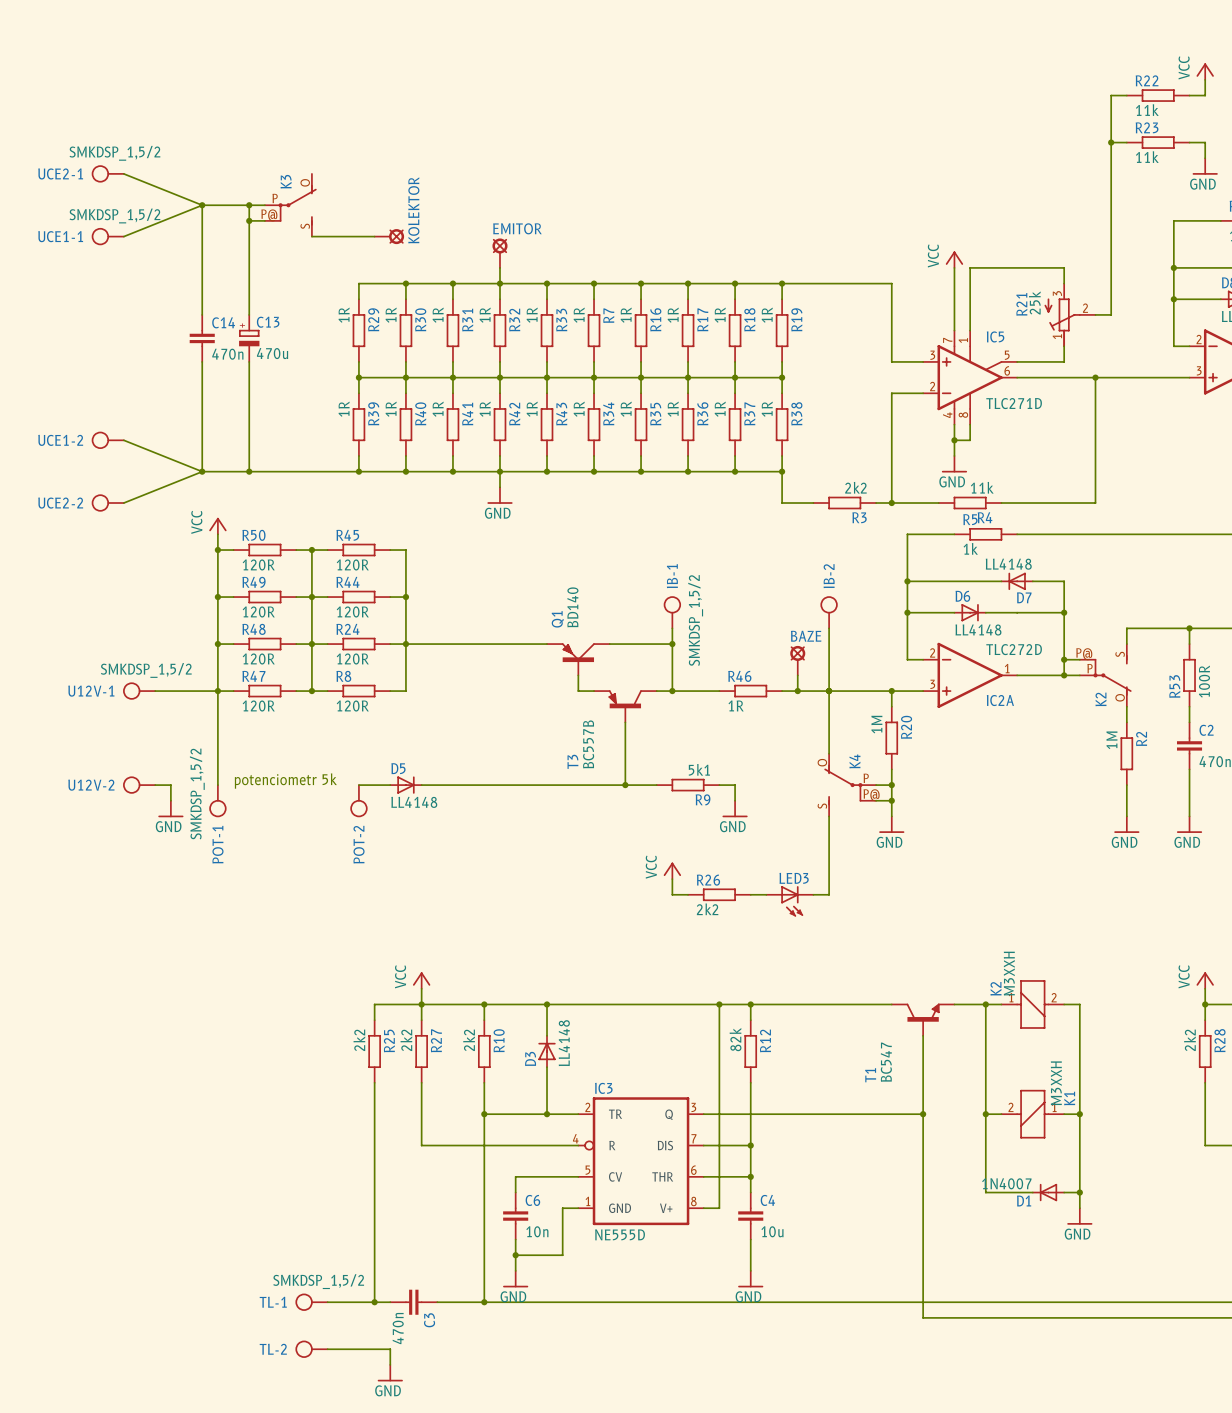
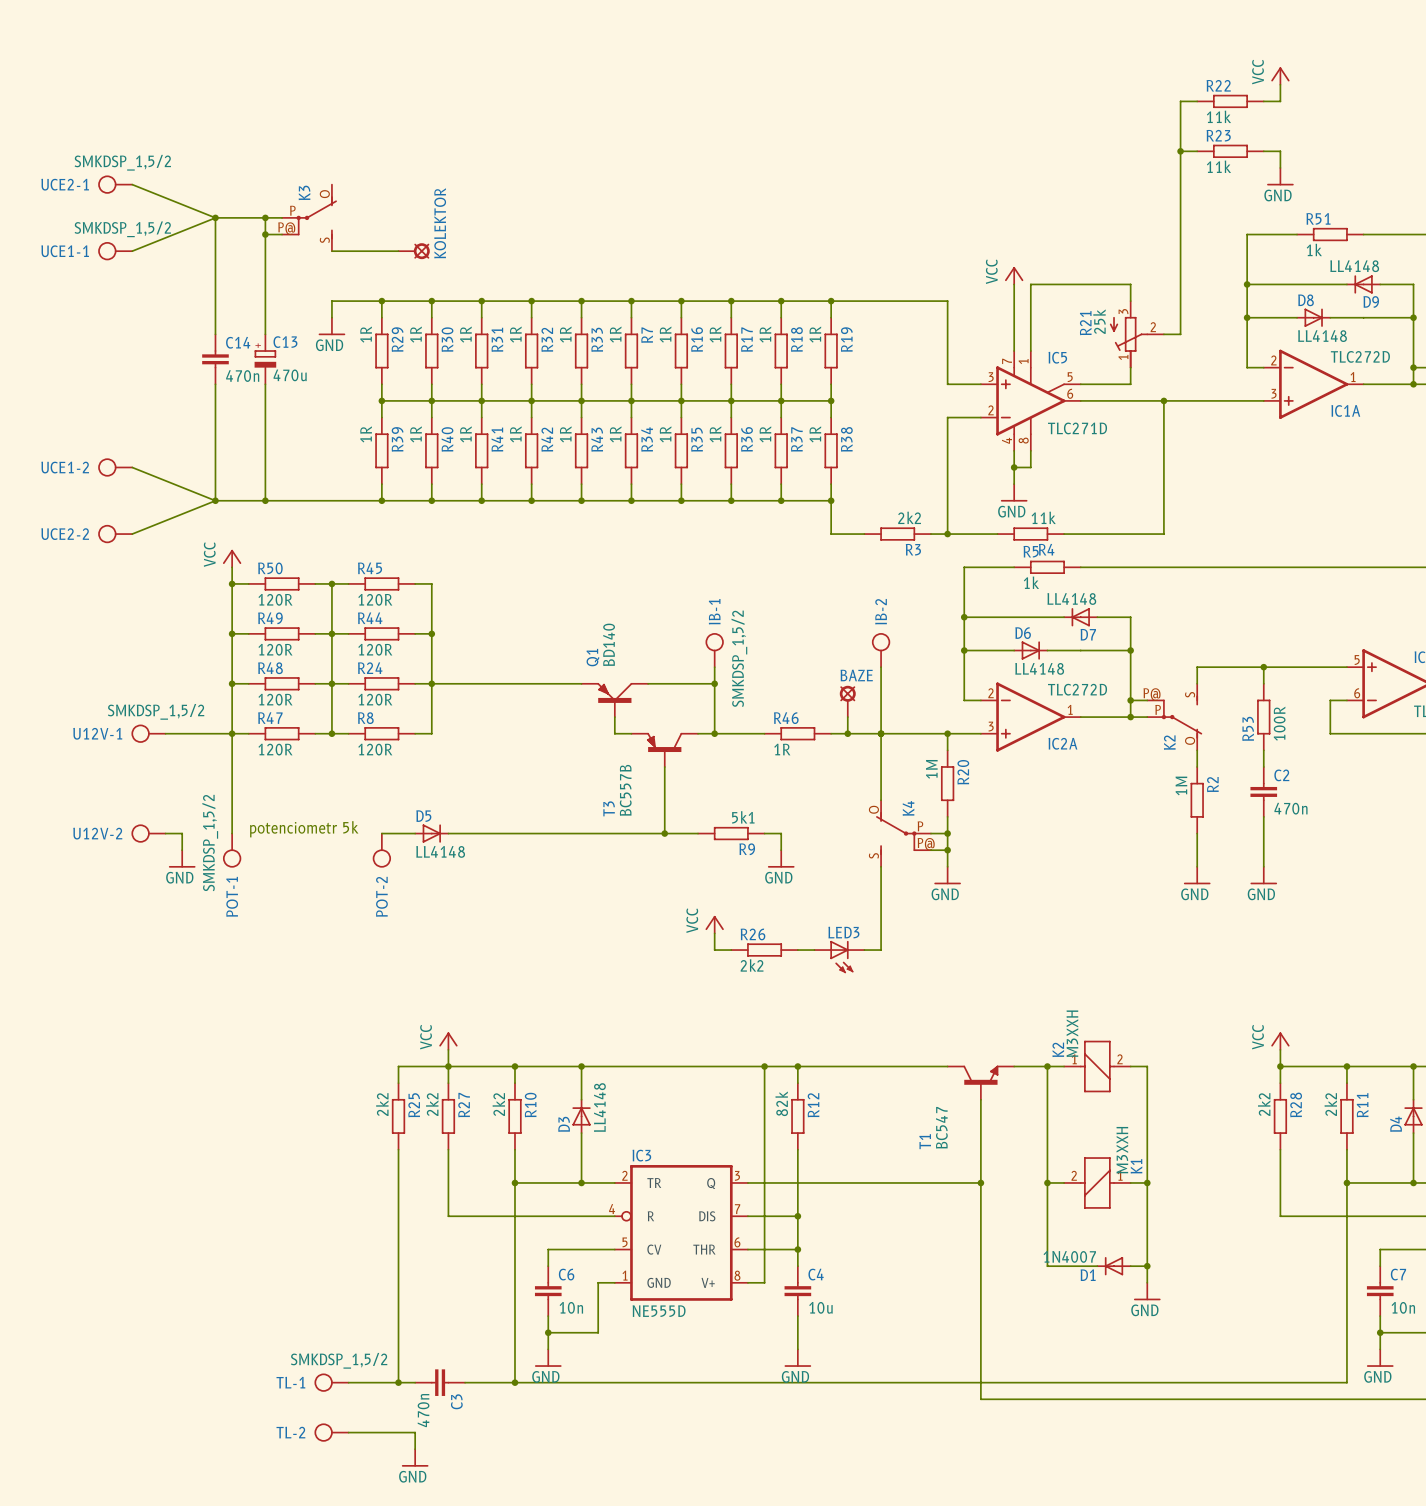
EMITOR: (499, 253) -> none
wire: (499, 267) (499, 283) -> none
wire: none -> (381, 301) (331, 301) (331, 317)
junction: none -> (381, 301)
power symbol: none -> GND (331, 326)
wire: (499, 471) (499, 487) -> none
power symbol: GND (499, 495) -> none

